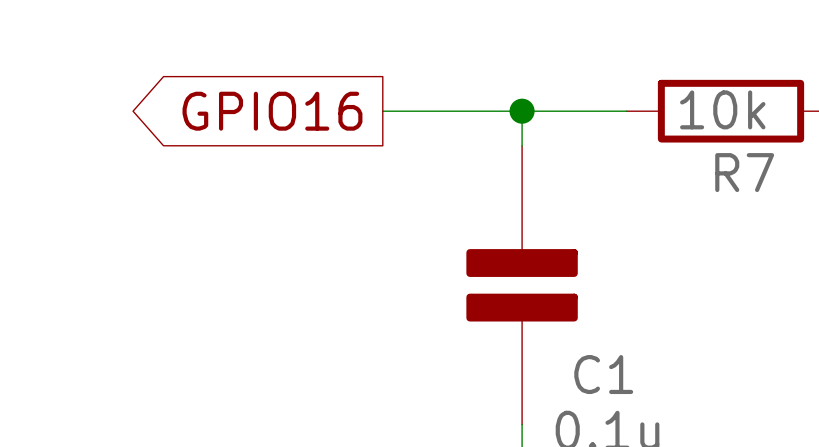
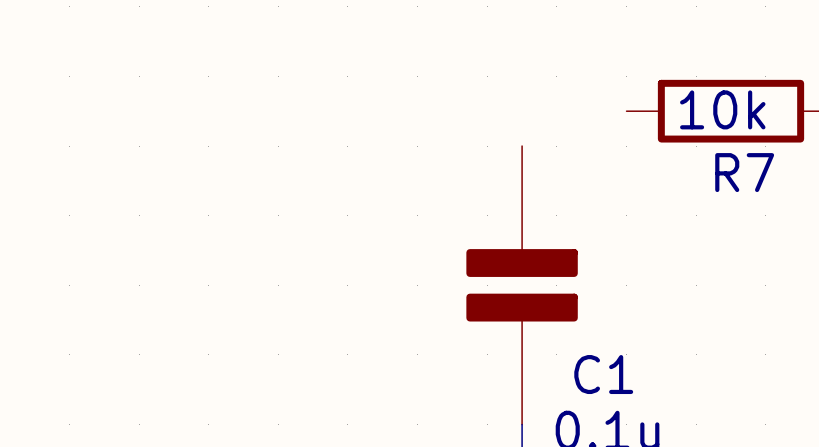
global label: GPIO16 (272, 111) -> none
wire: (382, 111) (626, 111) -> none
wire: (522, 111) (522, 146) -> none
junction: (522, 111) -> none

